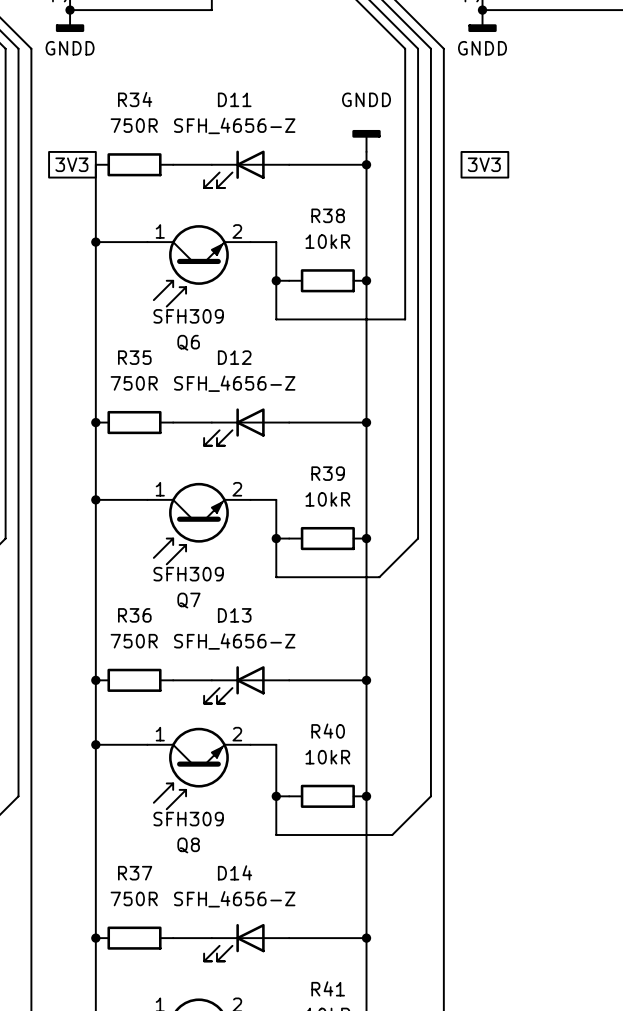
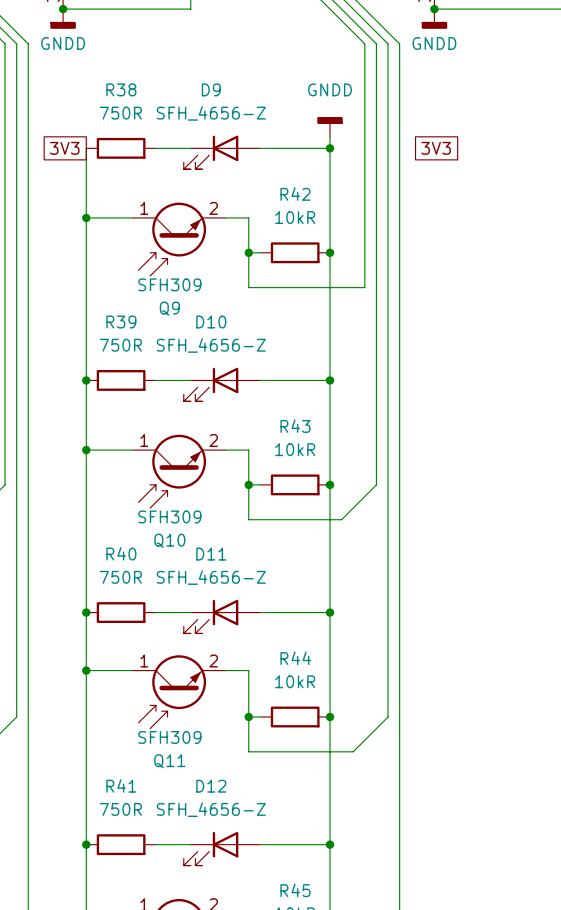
R34 name: R34 (135, 99) -> R38 (121, 89)
D11 name: D11 (234, 99) -> D9 (211, 89)
R38 name: R38 (328, 215) -> R42 (295, 194)
Q6 name: Q6 (188, 342) -> Q9 (169, 308)
R35 name: R35 (134, 357) -> R39 (121, 321)
D12 name: D12 (234, 357) -> D10 (211, 321)
R39 name: R39 (328, 473) -> R43 (295, 426)
Q7 name: Q7 (188, 600) -> Q10 (169, 540)
R36 name: R36 (134, 615) -> R40 (121, 553)
D13 name: D13 (234, 615) -> D11 (211, 554)
R40 name: R40 (328, 731) -> R44 (295, 658)
Q8 name: Q8 (188, 845) -> Q11 (169, 761)
D14 name: D14 (235, 872) -> D12 (211, 786)
R37 name: R37 (135, 873) -> R41 (121, 785)
R41 name: R41 (328, 988) -> R45 (295, 890)

